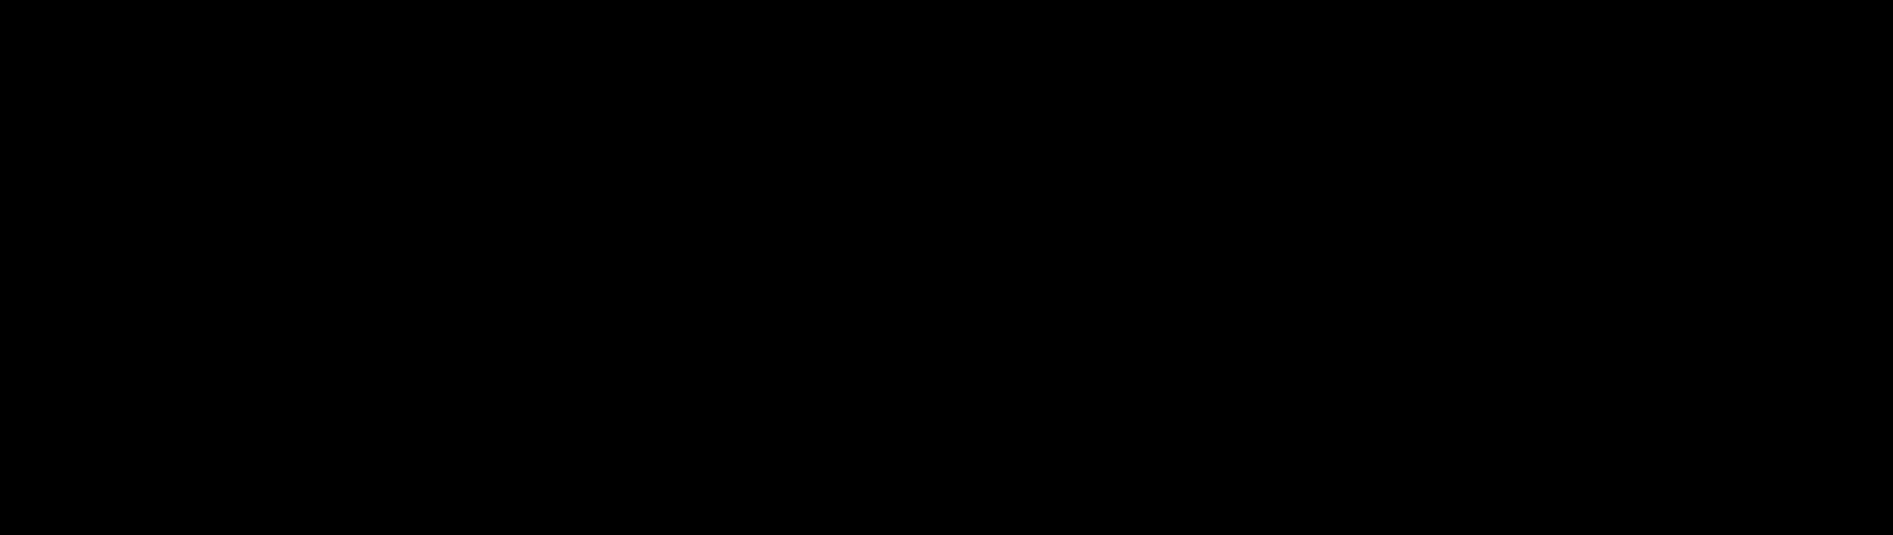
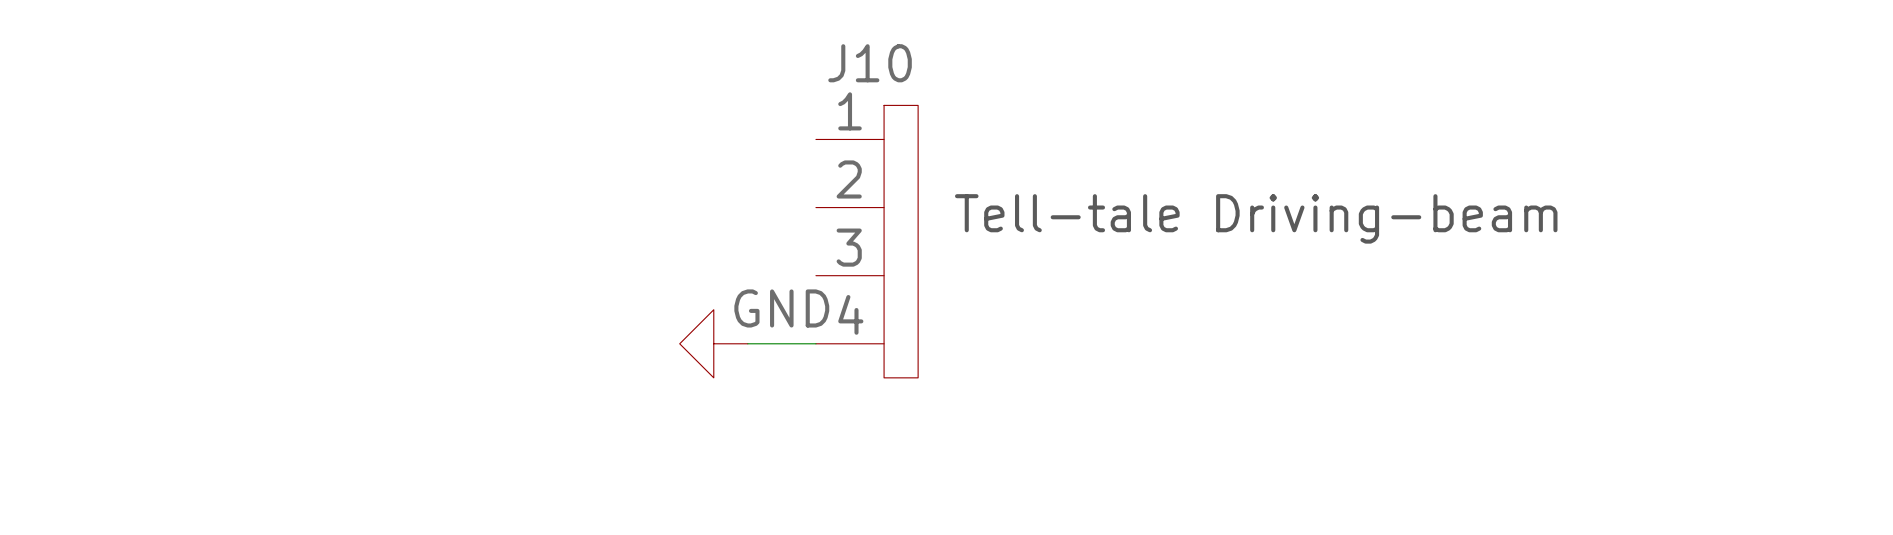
text: none -> Tell-tale Driving-beam (1256, 218)
J10: none -> (867, 241)
power symbol: none -> GND (713, 343)
wire: none -> (747, 343) (815, 343)

